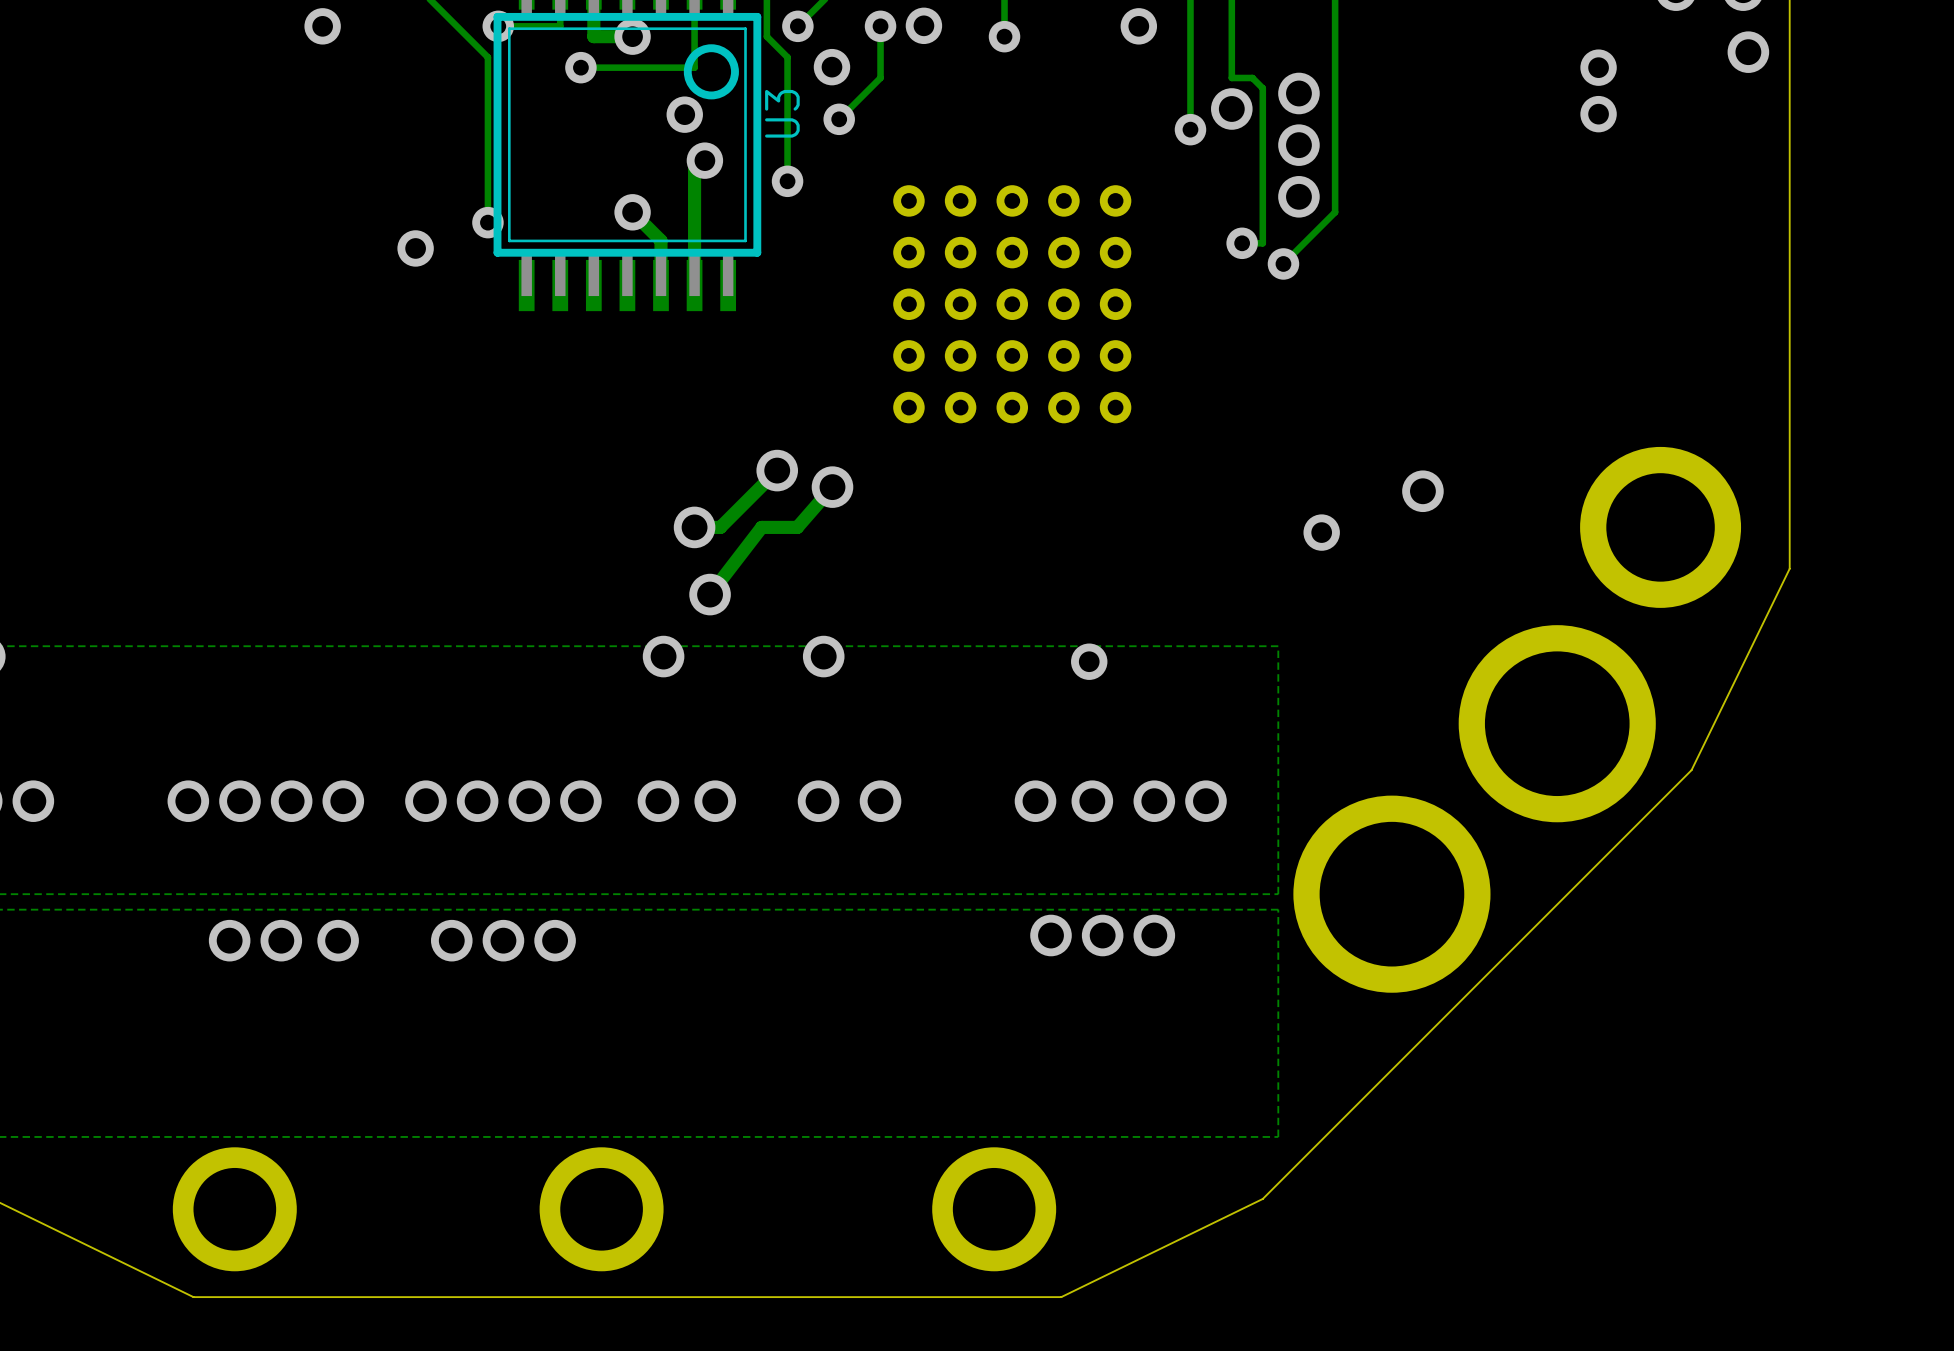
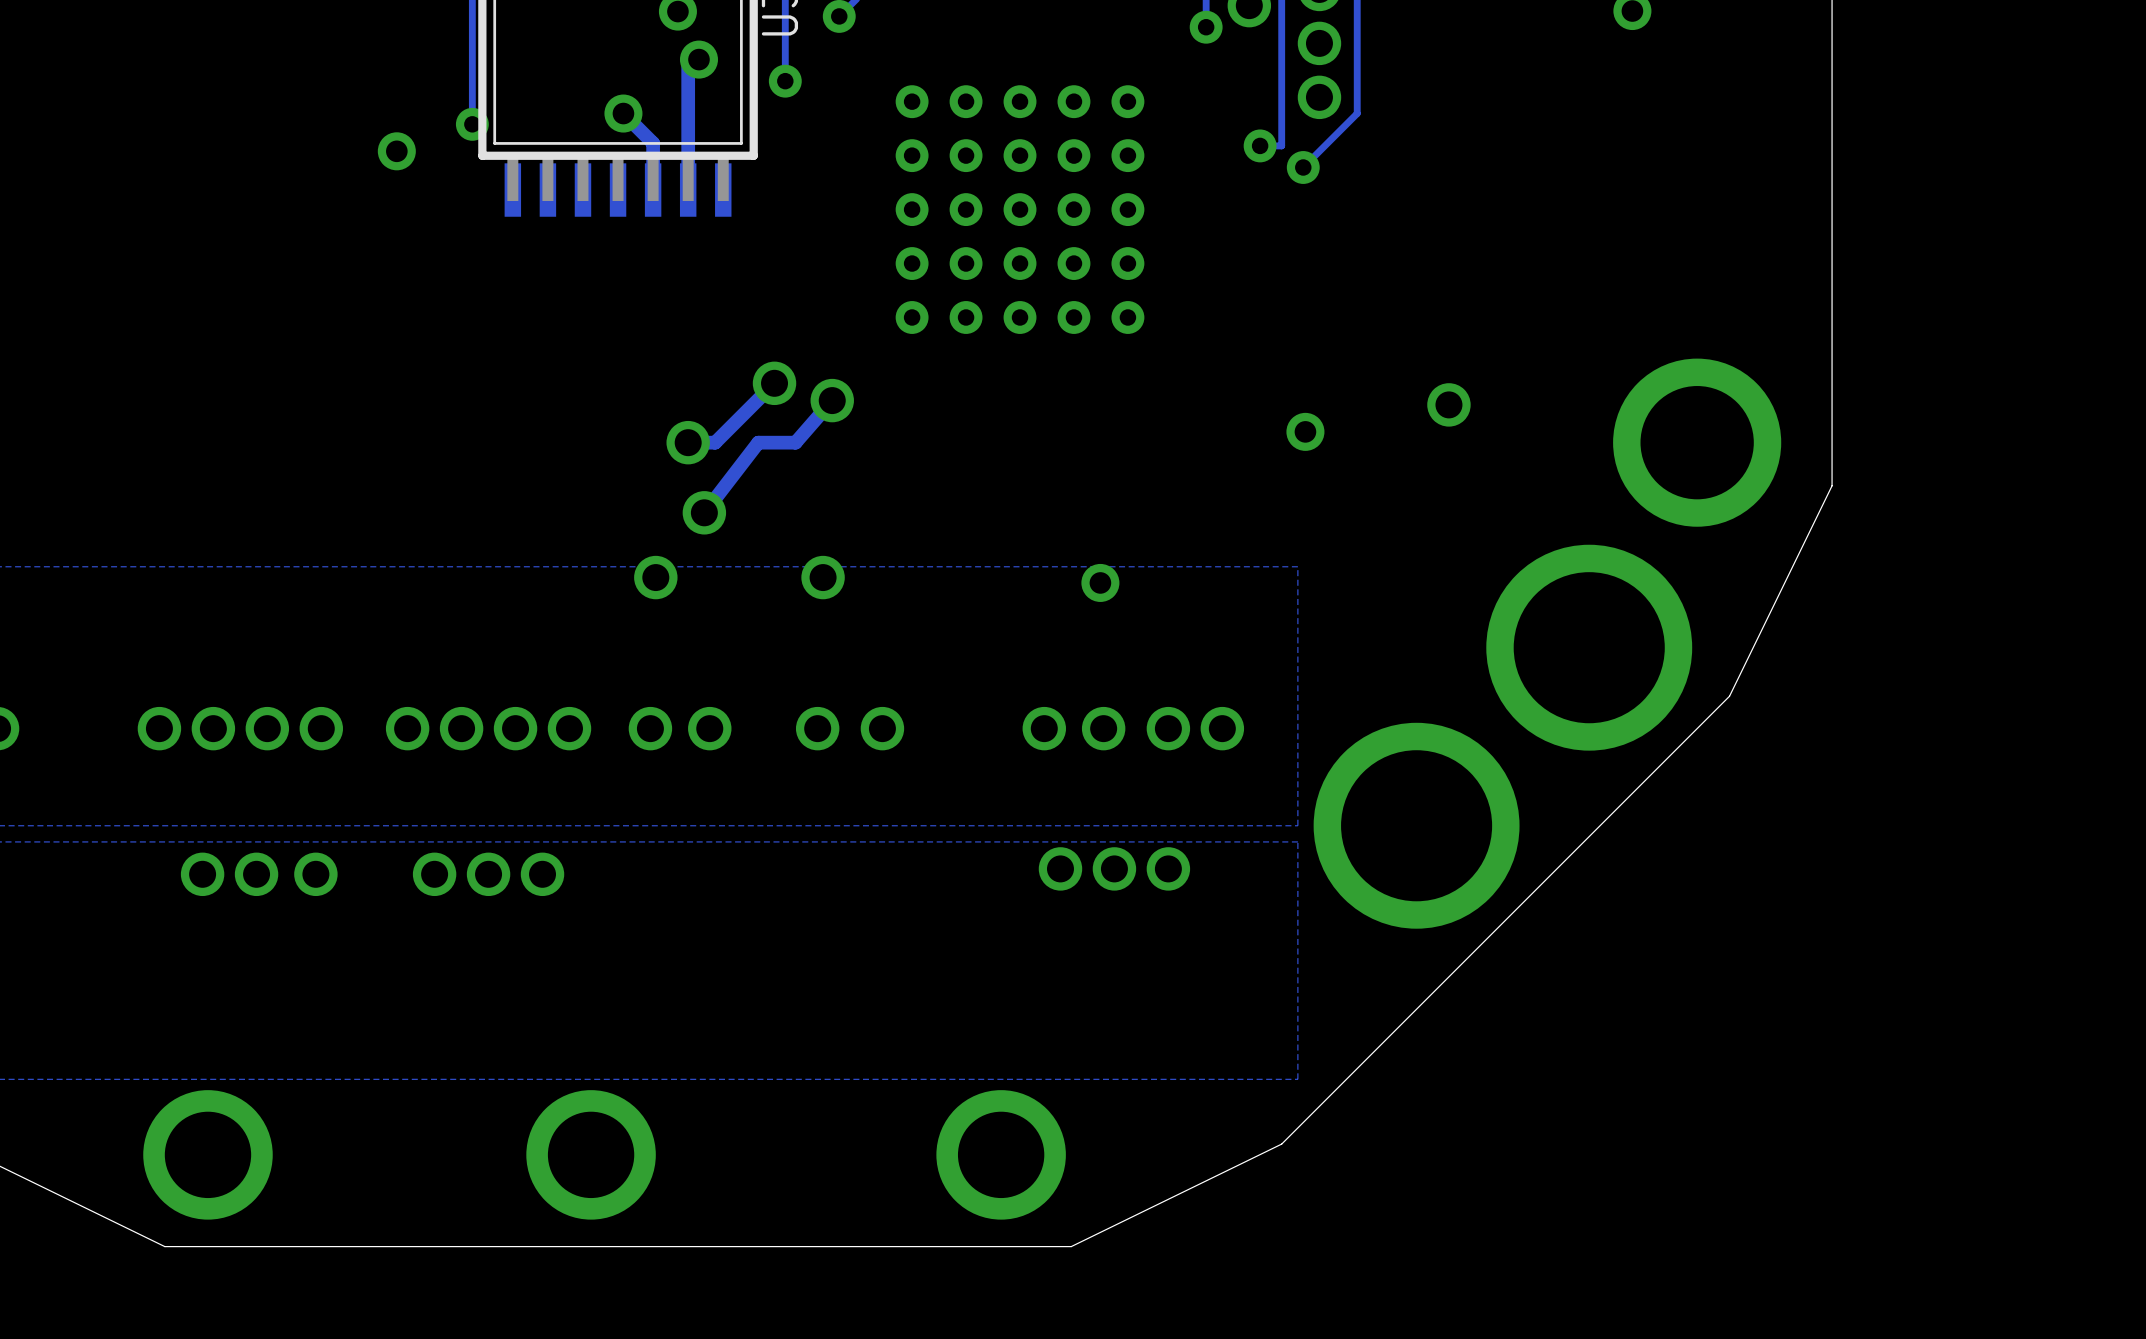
via position: (1321, 532) -> (1305, 431)

